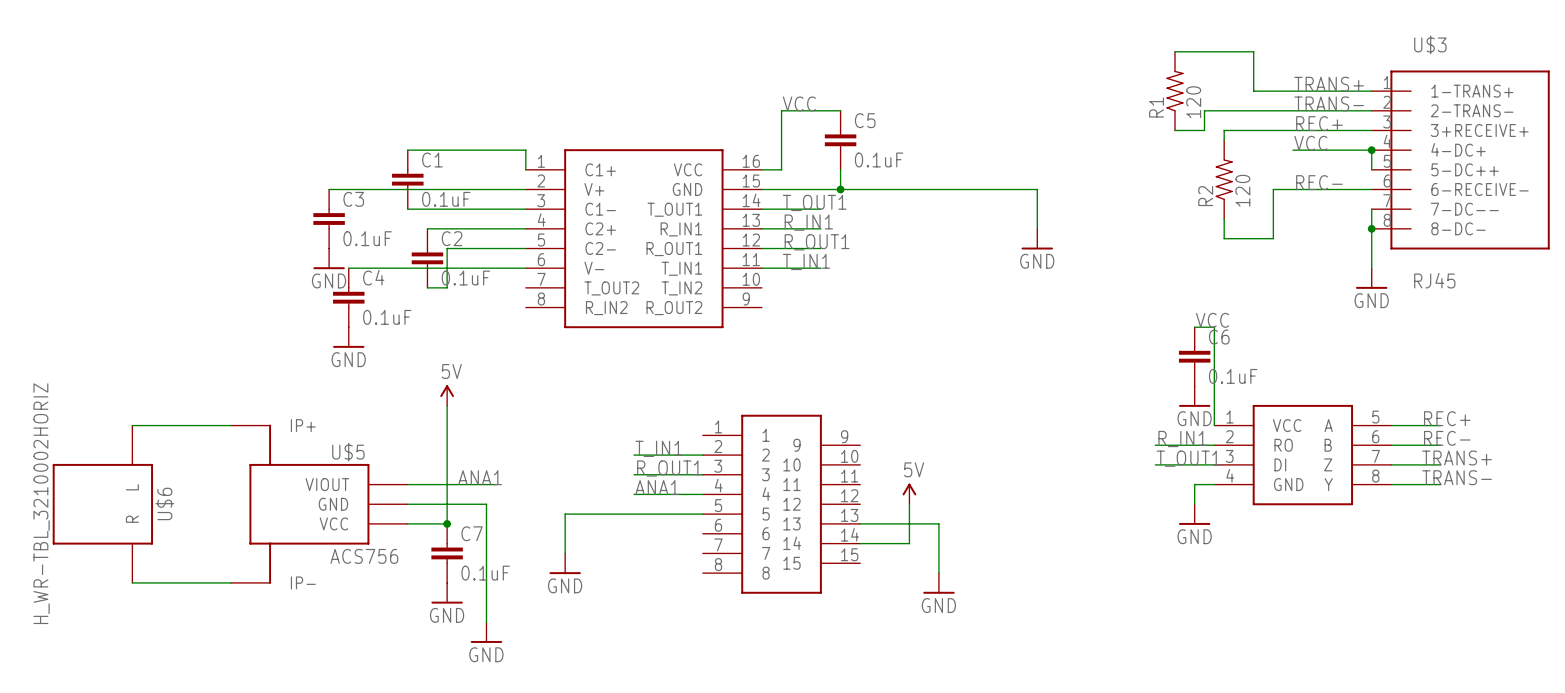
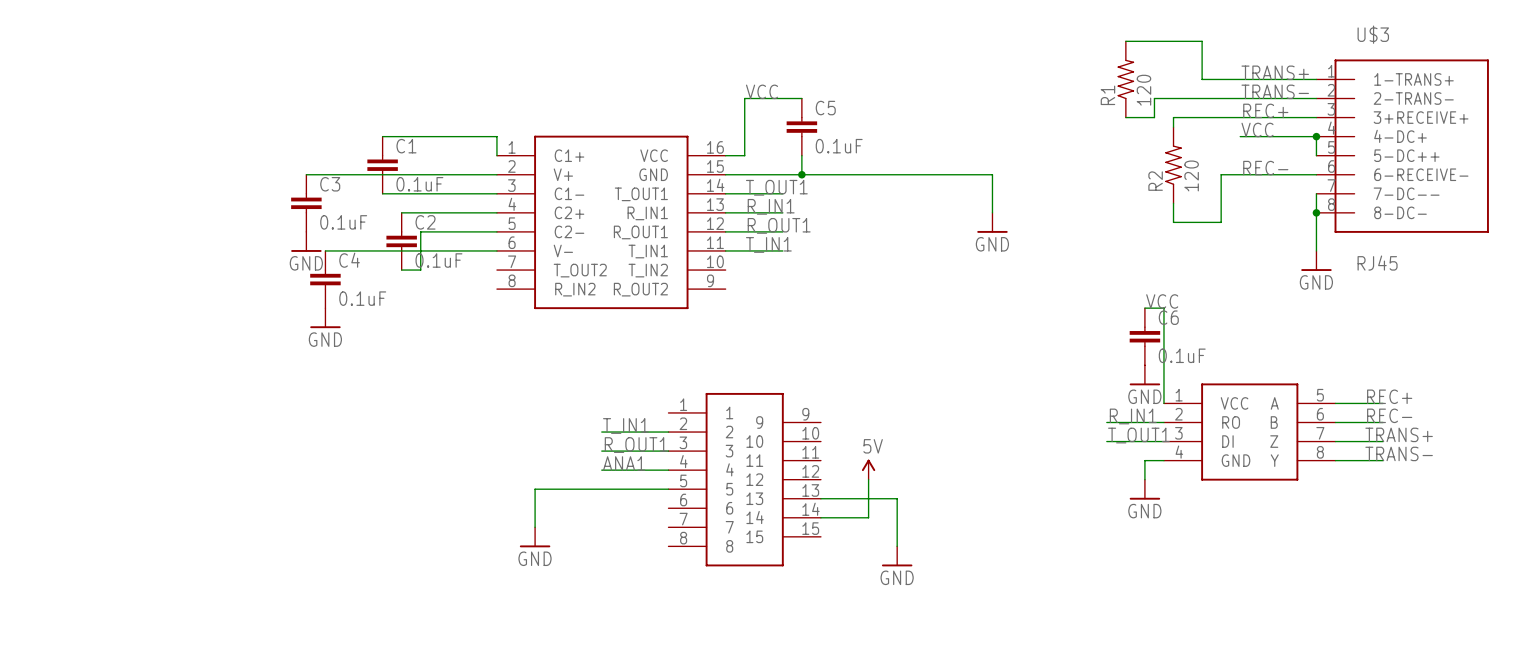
power symbol: 5V (447, 395) -> none
wire: (447, 405) (447, 523) (407, 523) -> none
wire: (132, 425) (230, 425) -> none
label: ANA1 (480, 477) -> none
wire: (407, 484) (496, 484) -> none
U$6: H_WR-TBL_3210002HORIZ (102, 504) -> none
U$5: ACS756 (319, 504) -> none
wire: (407, 504) (486, 504) (486, 622) -> none
junction: (447, 523) -> none
C7: 0.1uF (447, 553) -> none
wire: (132, 582) (230, 582) -> none
power symbol: GND (447, 593) -> none
power symbol: GND (486, 632) -> none

